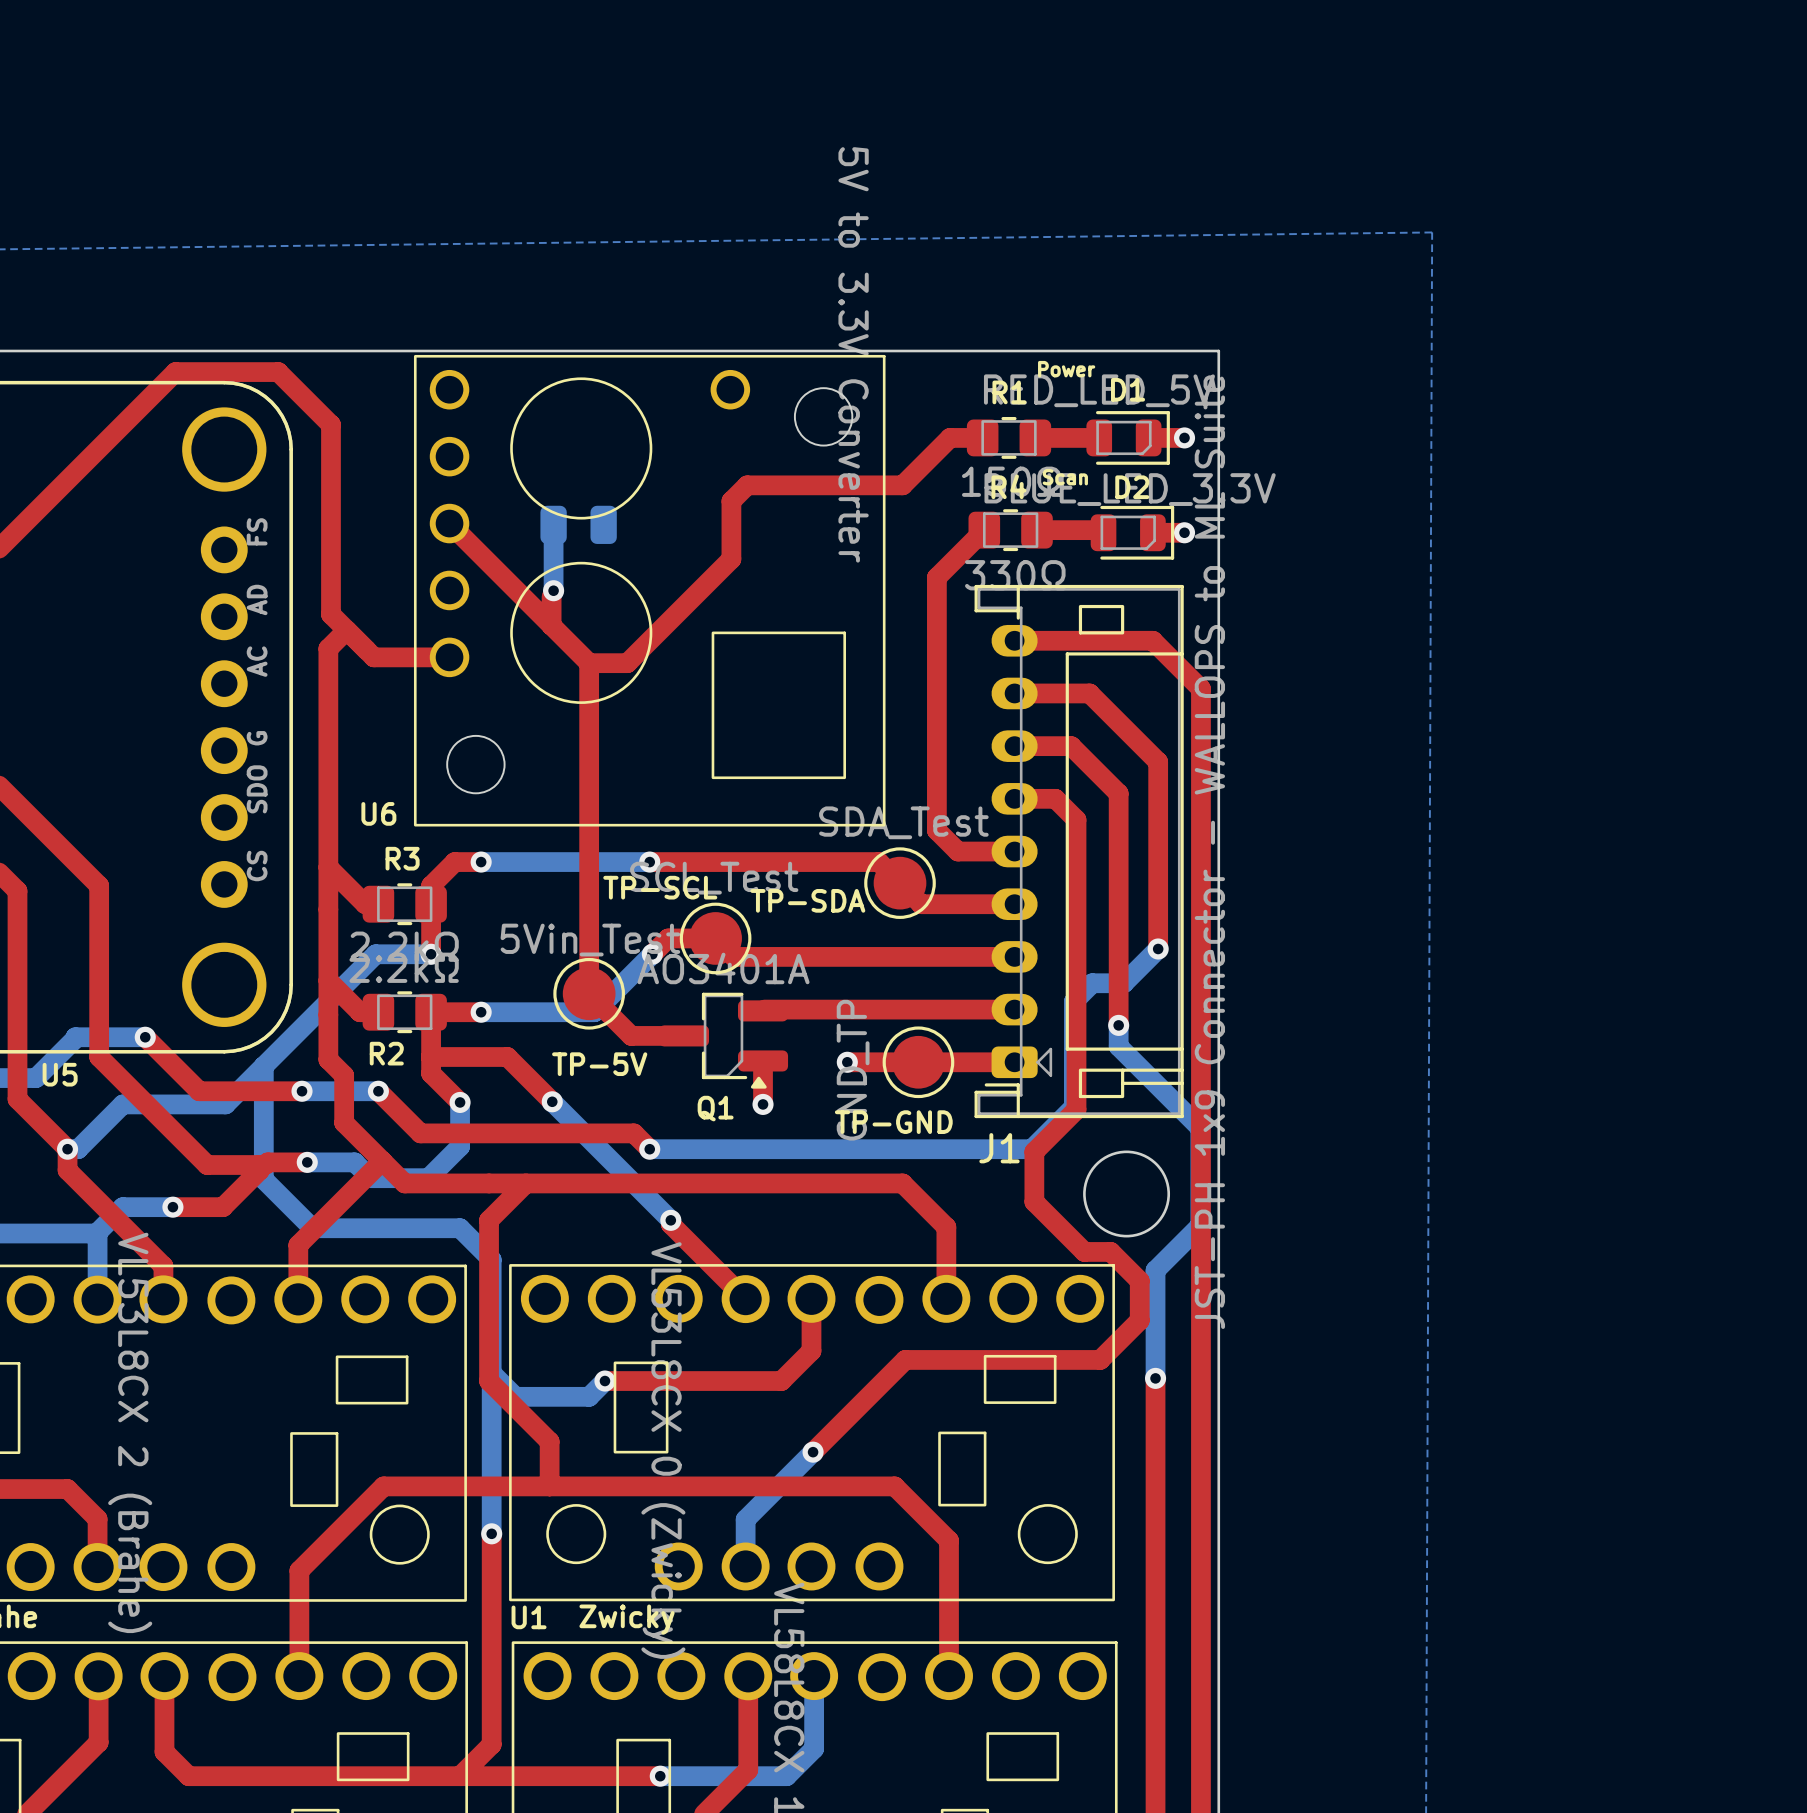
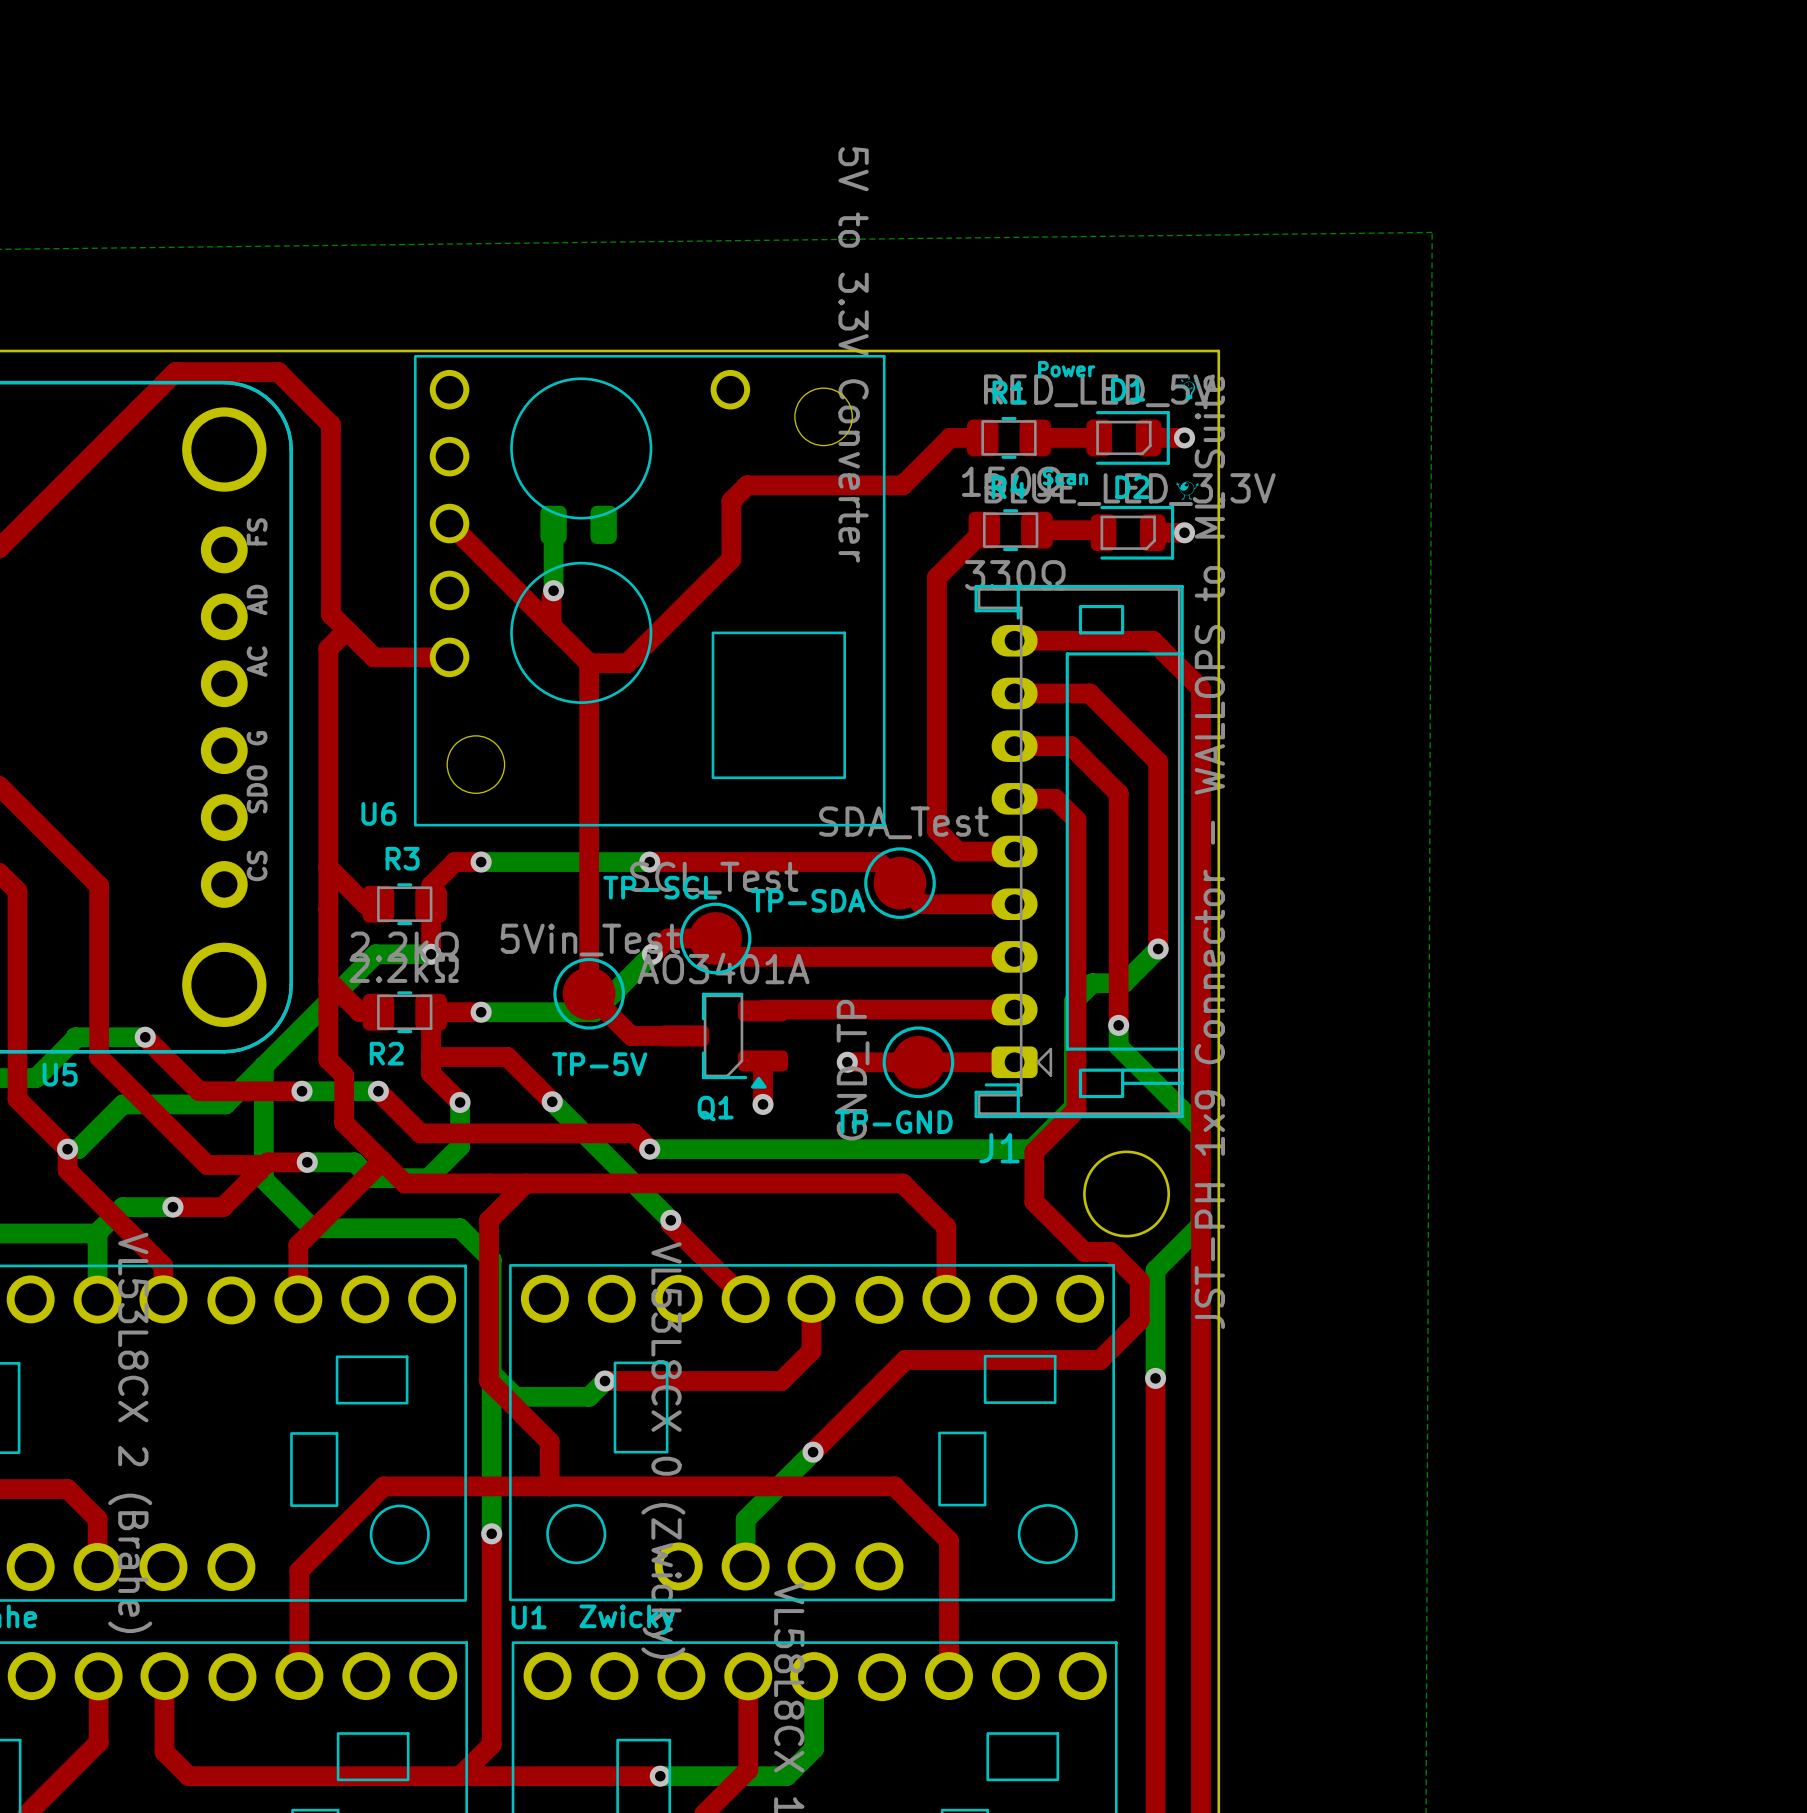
drawing: none -> [1177, 376, 1201, 401]
drawing: none -> [1176, 481, 1199, 500]

